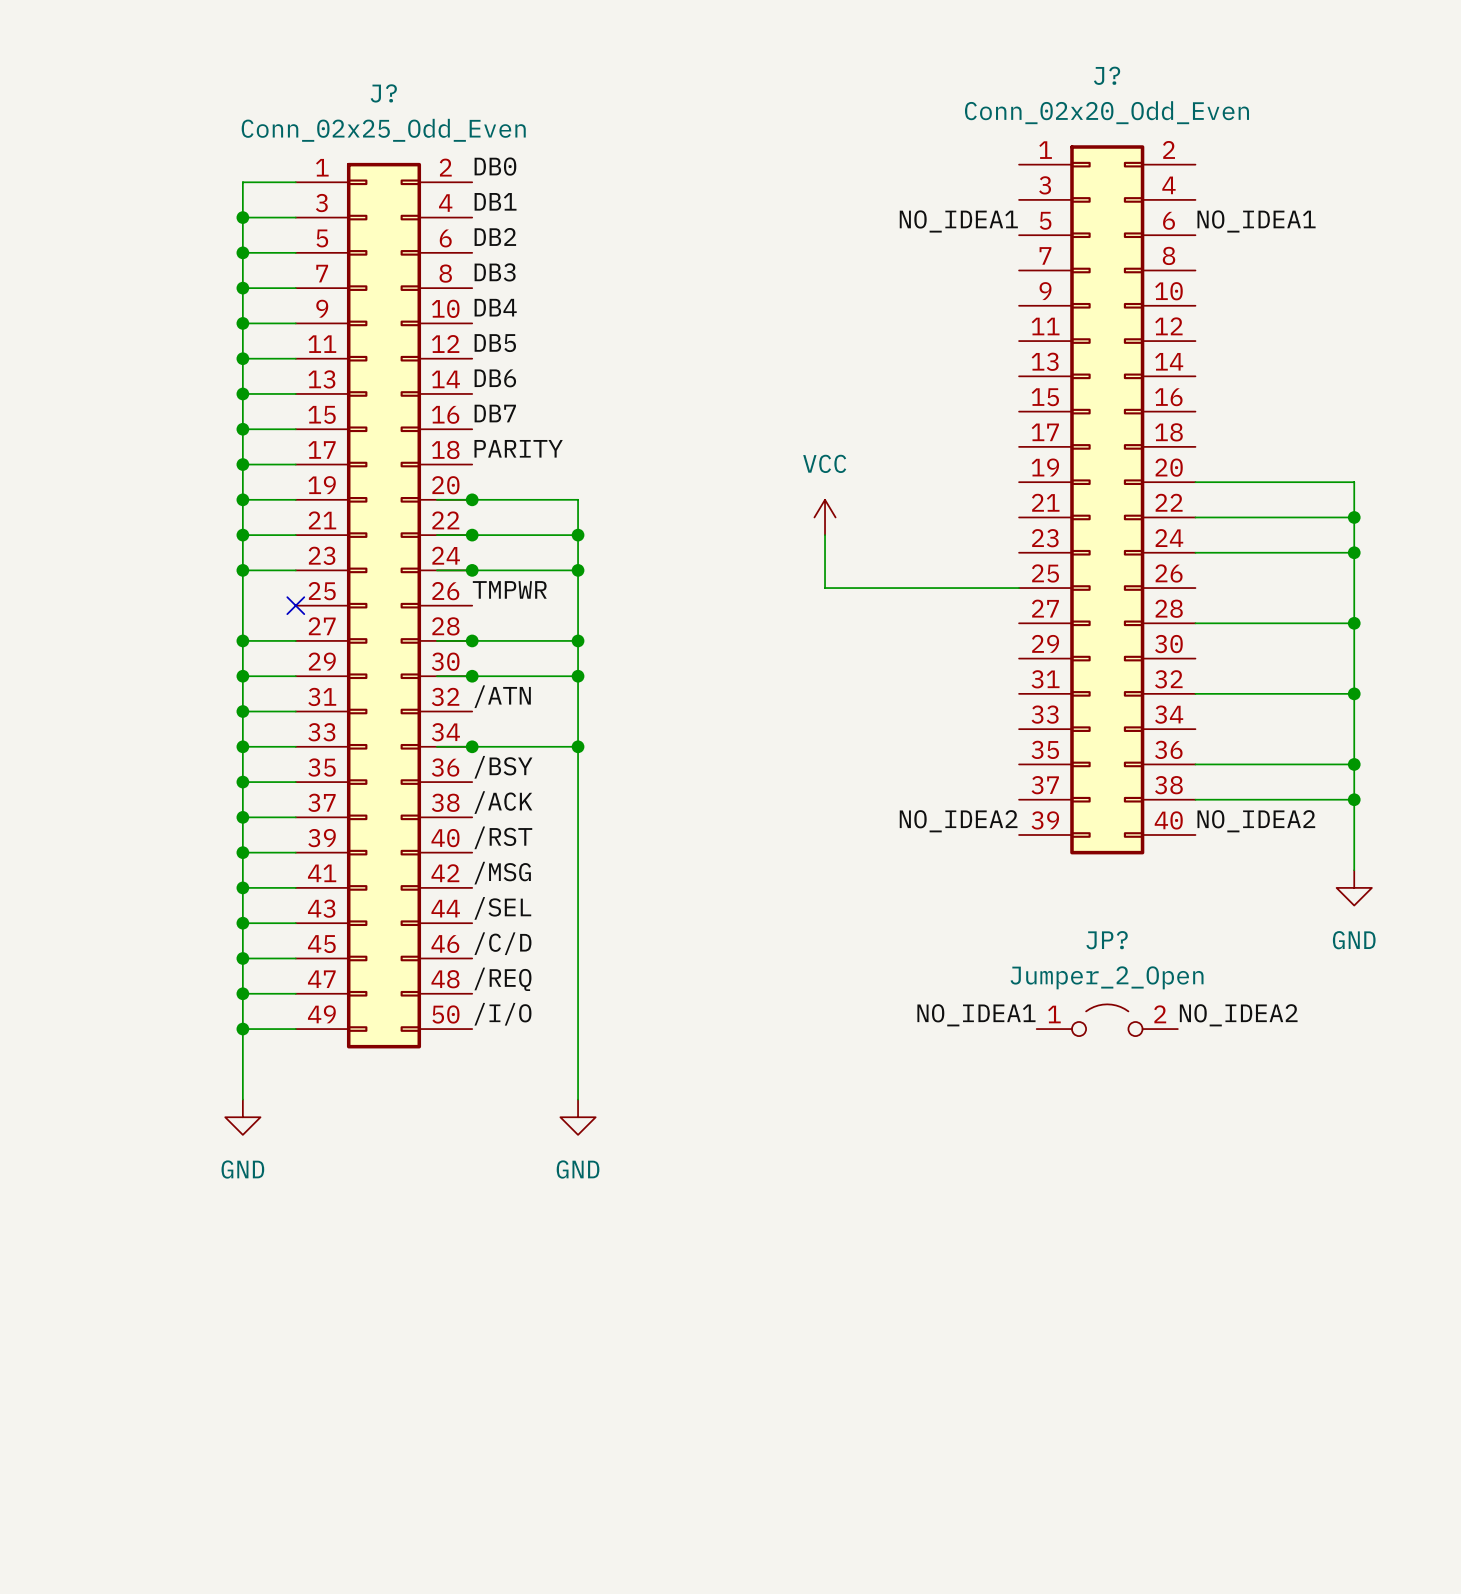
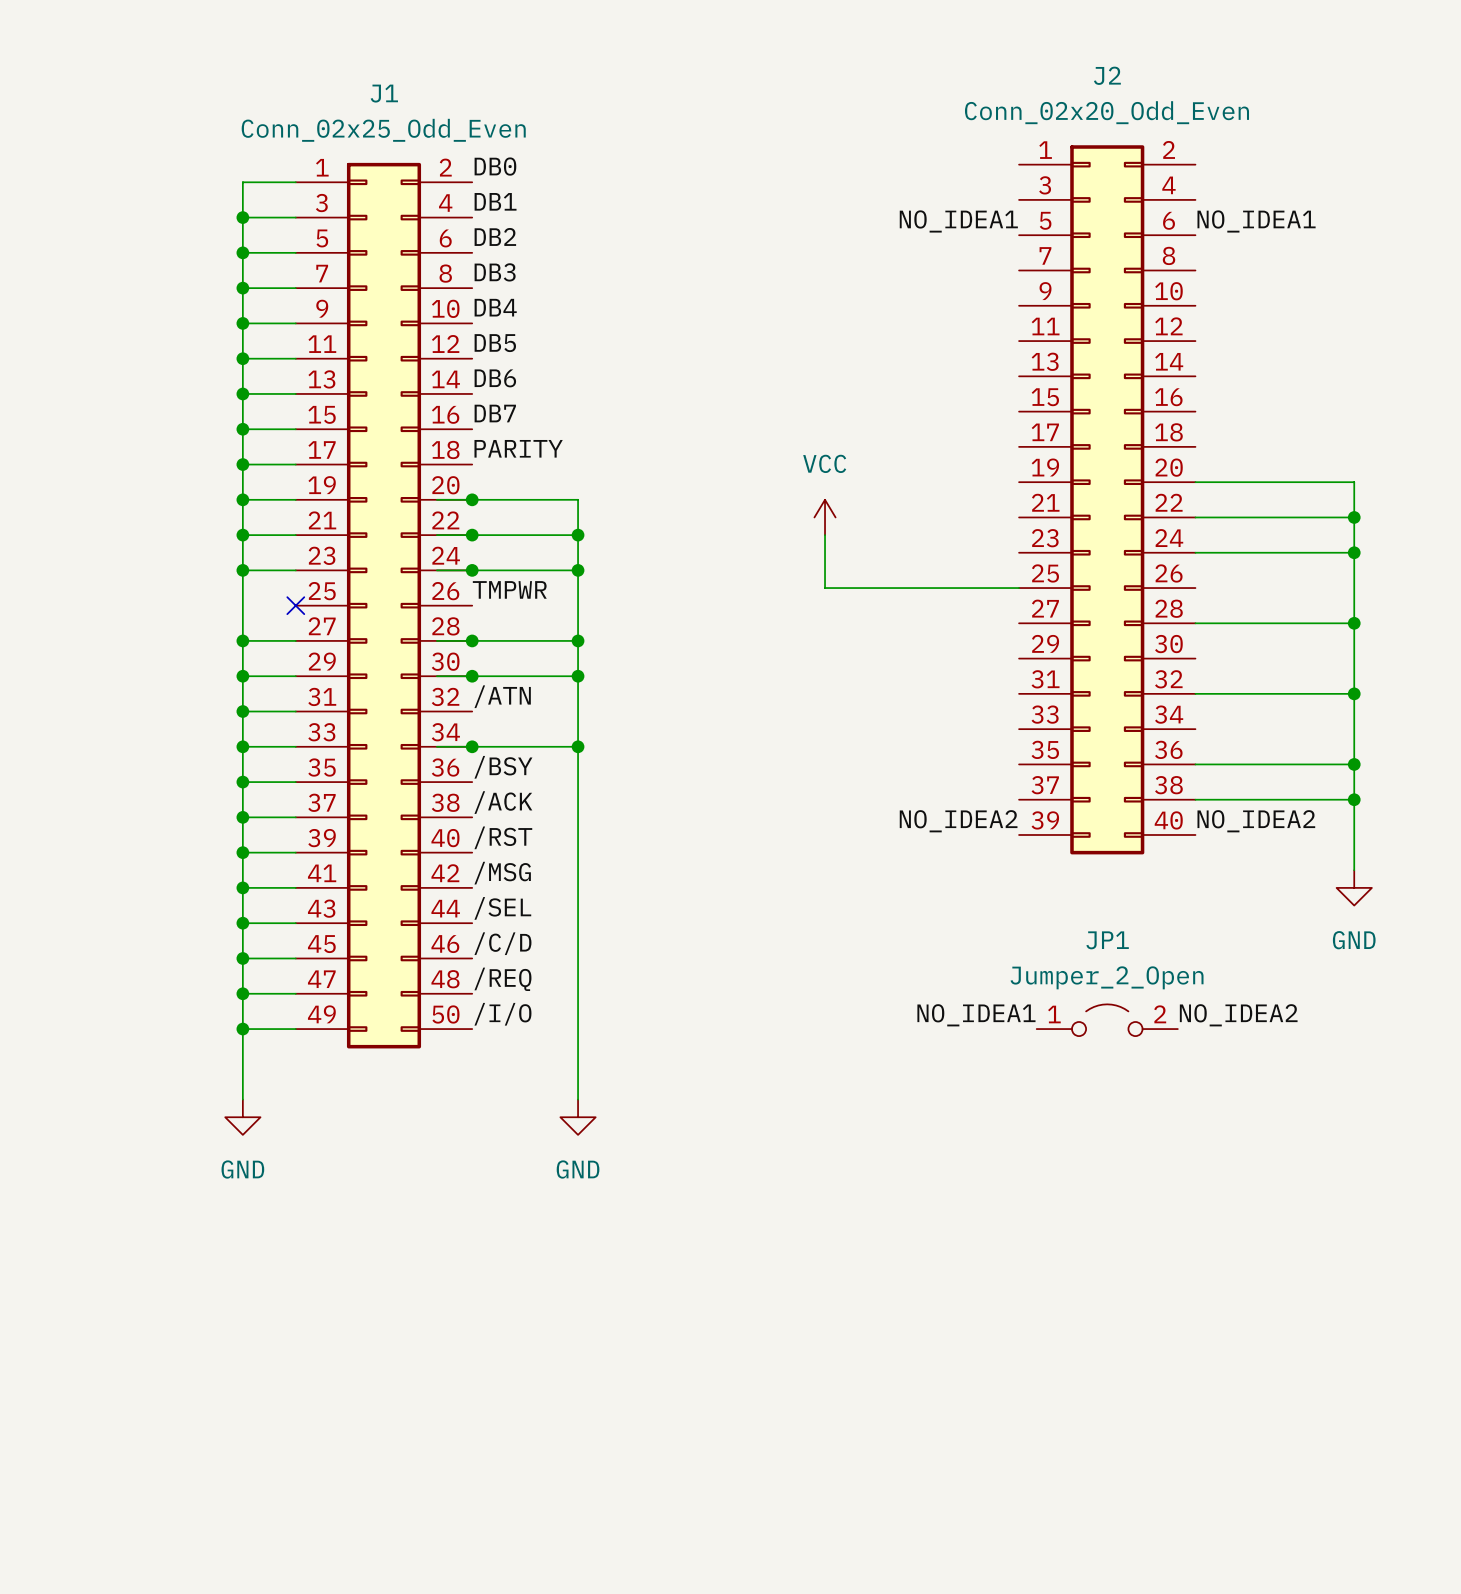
J? name: J? (1107, 75) -> J2 (1107, 75)
J? name: J? (383, 93) -> J1 (384, 93)
JP? name: JP? (1107, 940) -> JP1 (1107, 940)

